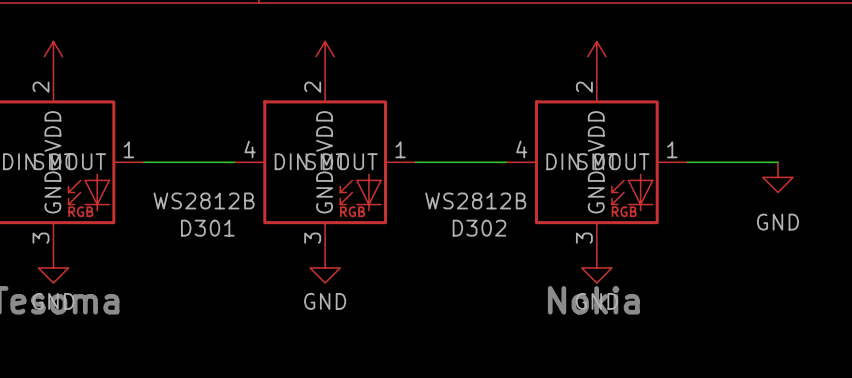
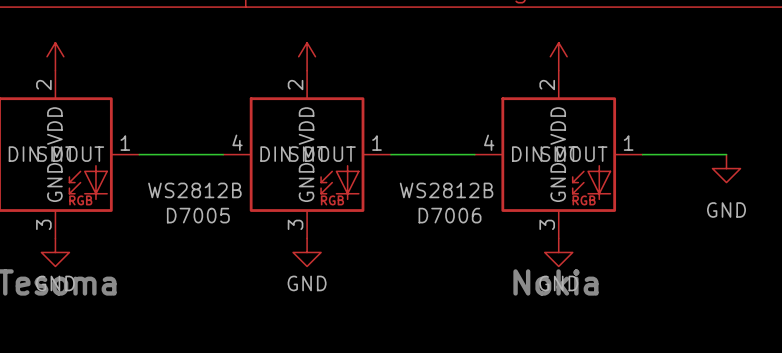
D301 name: D301 (207, 228) -> D7005 (198, 215)
D302 name: D302 (479, 228) -> D7006 (450, 215)

